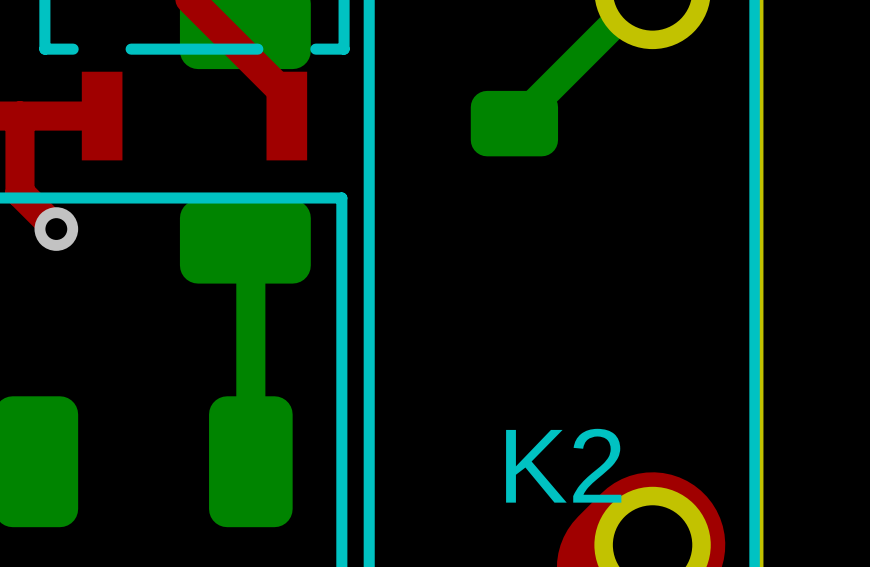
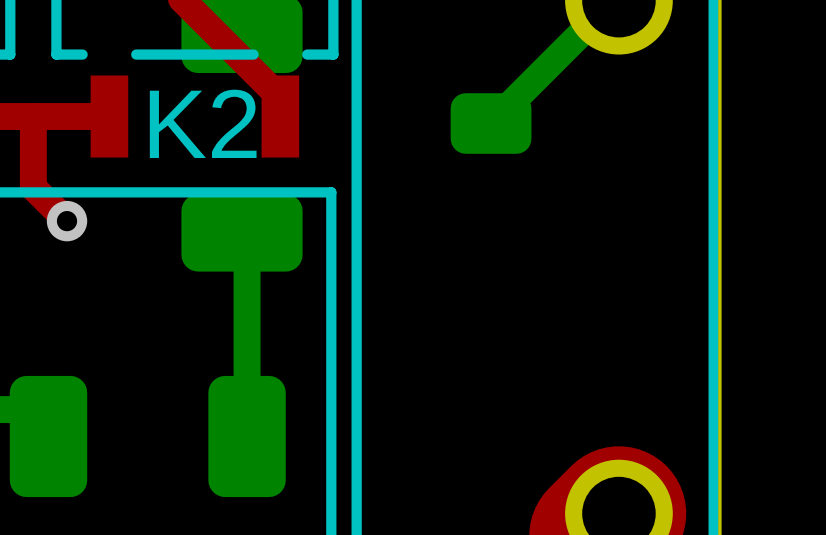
K2 name position: K2 (563, 465) -> K2 (203, 123)

